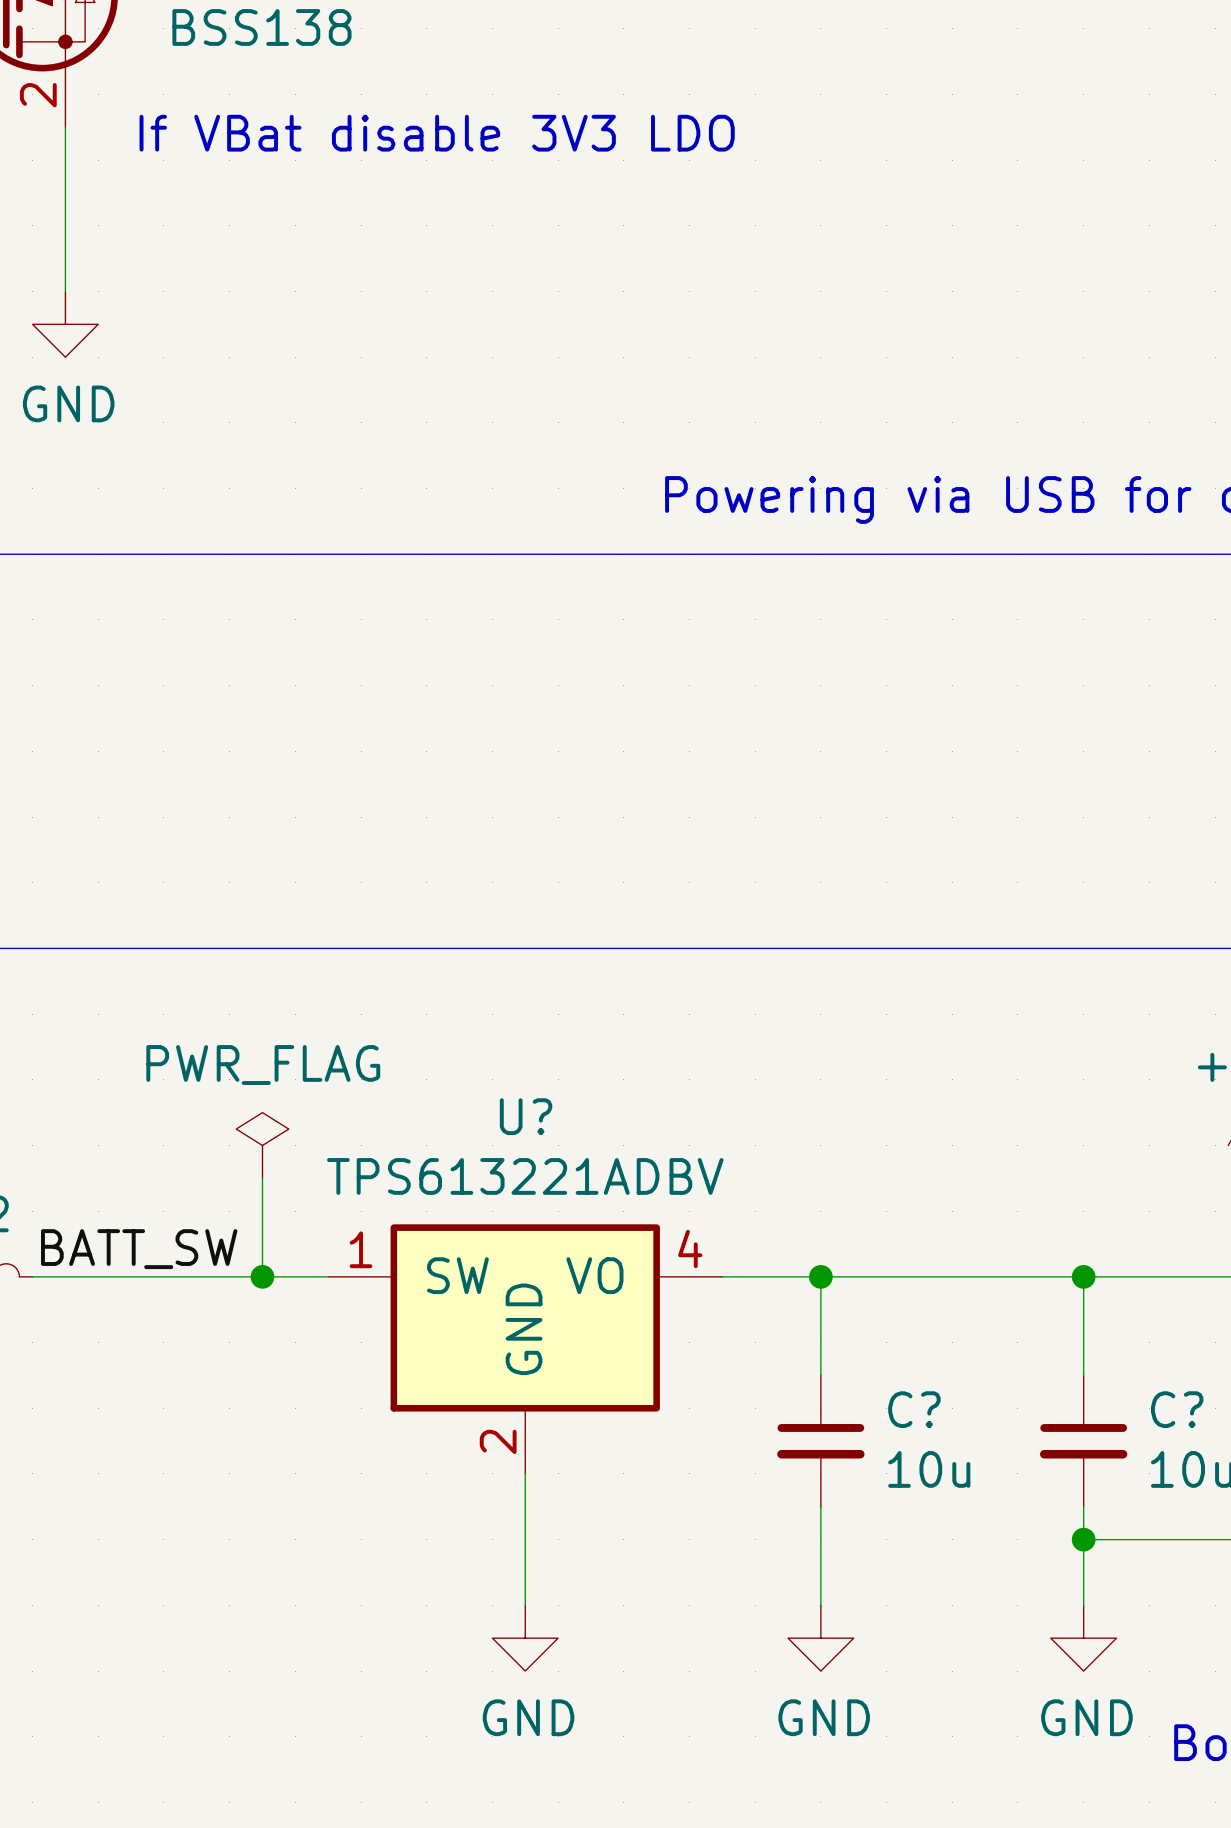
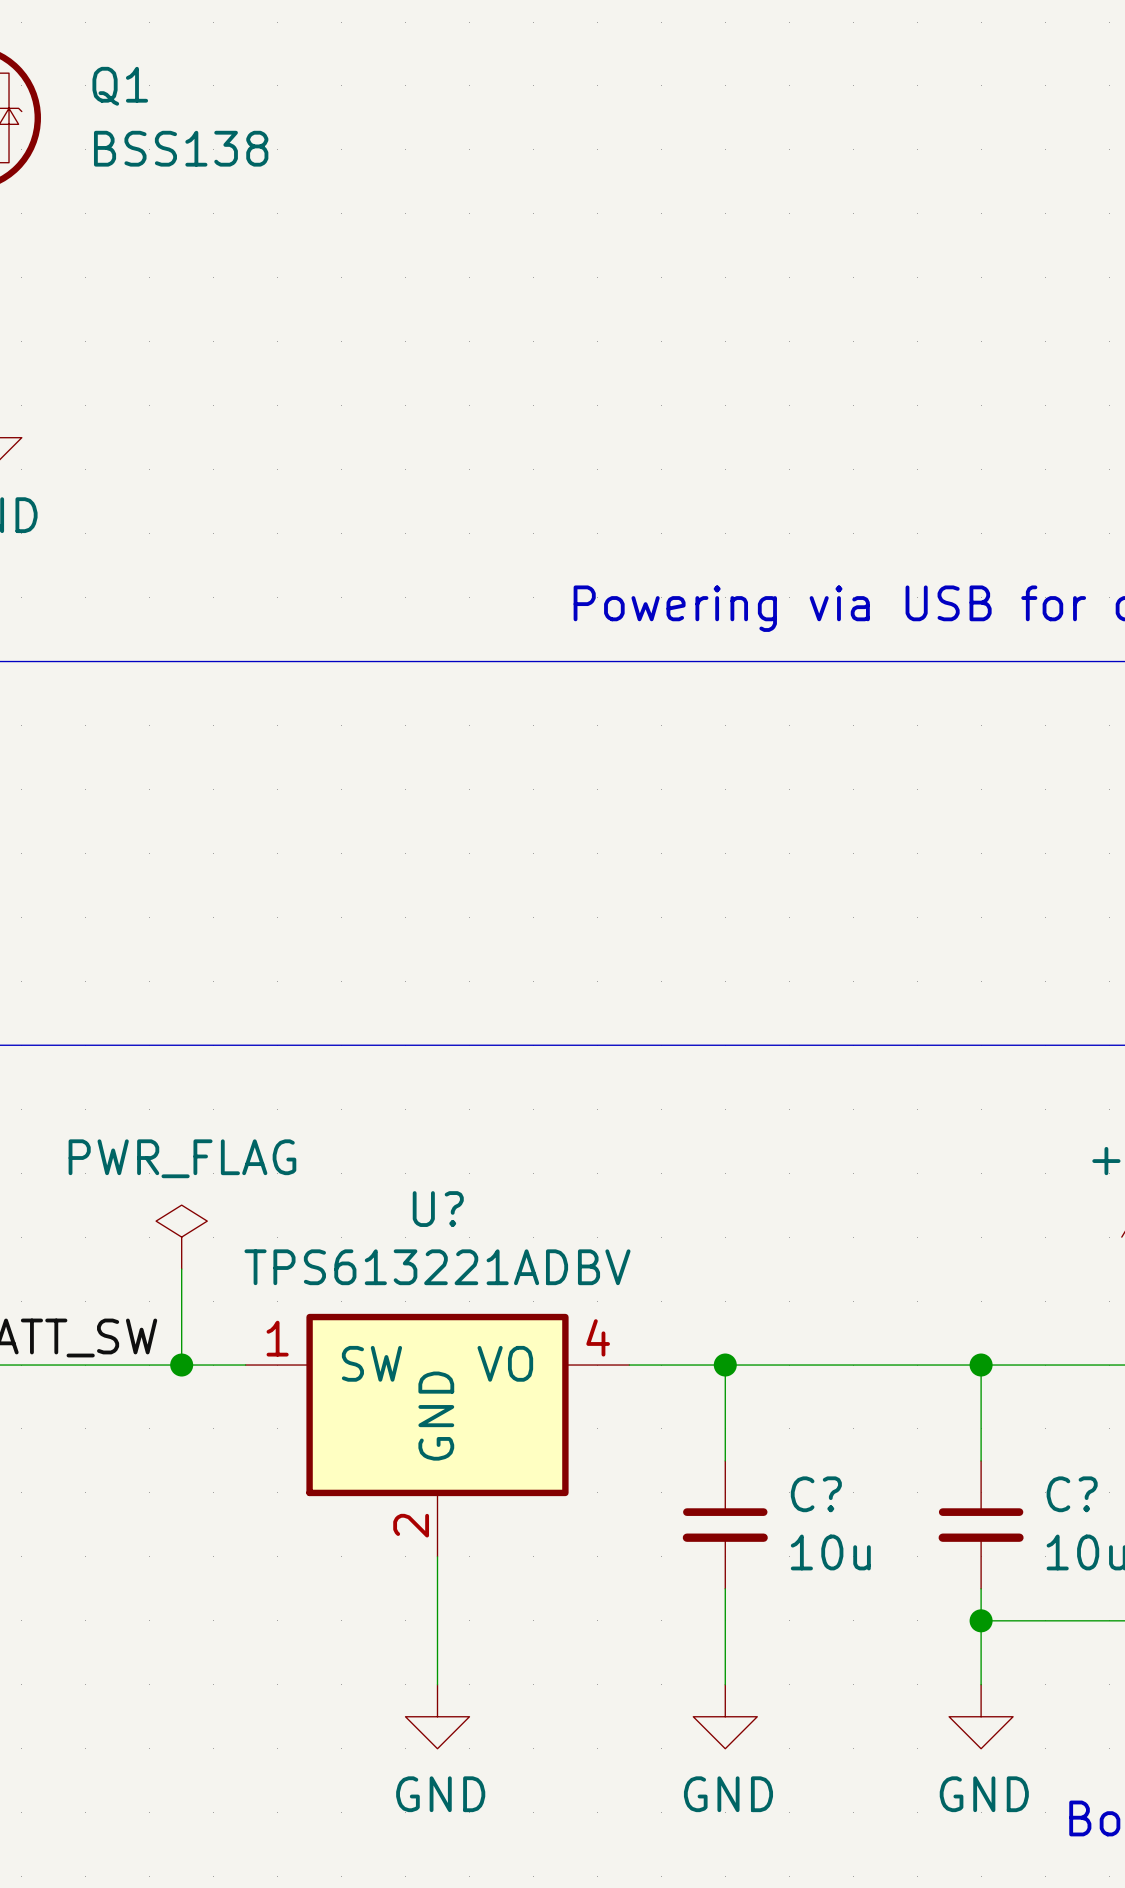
text: If VBat disable 3V3 LDO (437, 133) -> none

